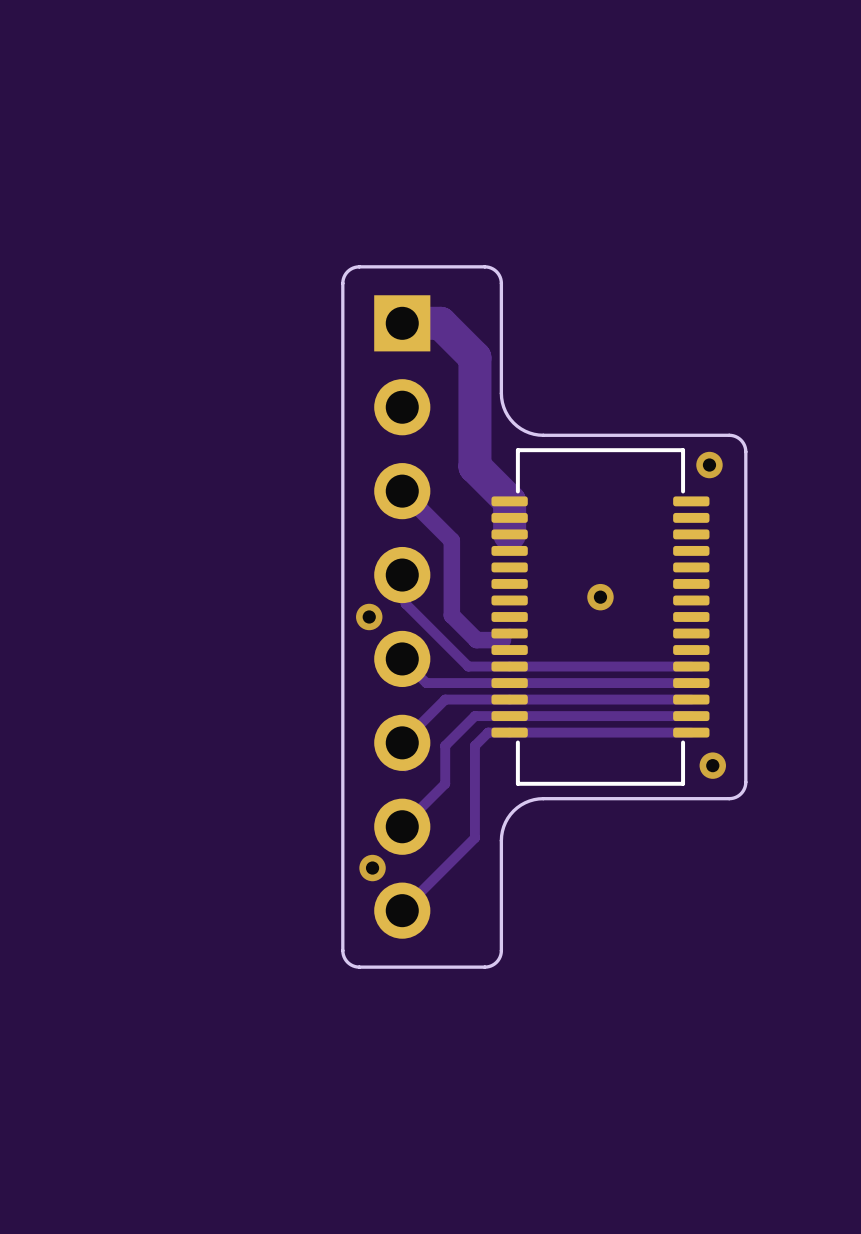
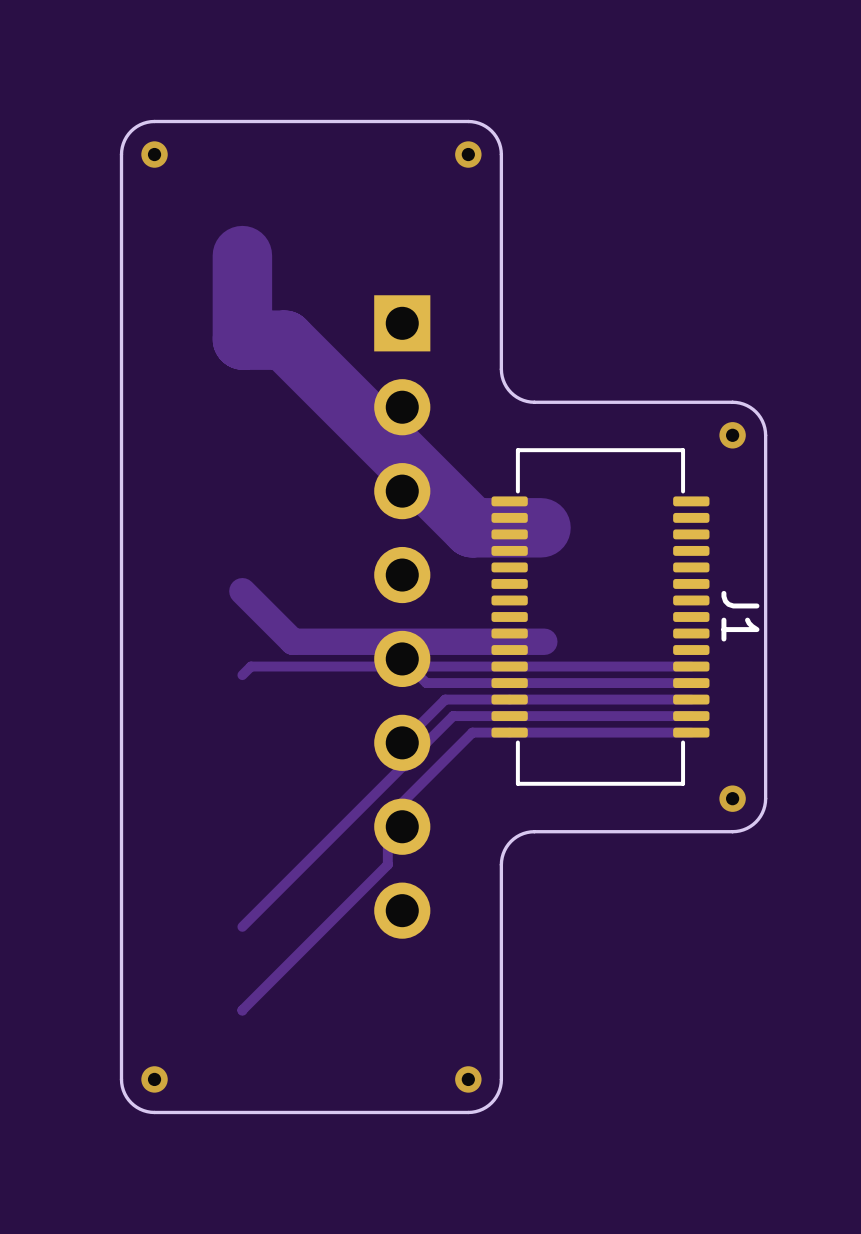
via: none -> (154, 154)
via: none -> (468, 154)
track: none -> (242, 255) (243, 340) (284, 340) (472, 527) (541, 527)
board edge: (501, 283) (496, 271) (484, 266) (357, 266) (347, 271) (342, 283) (343, 954) (349, 963) (357, 966) (484, 967) (496, 962) (501, 950) -> (501, 283) (501, 150) (494, 133) (479, 123) (468, 121) (154, 121) (136, 126) (124, 140) (121, 154) (121, 1079) (123, 1090) (133, 1105) (150, 1112) (468, 1112) (479, 1110) (494, 1100) (501, 1083) (501, 950)
track: (402, 323) (440, 323) (474, 357) (474, 466) (509, 501) (509, 534) -> none
board edge: (501, 369) (501, 398) (505, 411) (517, 426) (529, 432) (543, 435) (731, 435) (742, 441) (745, 451) (745, 782) (743, 790) (737, 796) (729, 798) (543, 798) (529, 801) (517, 807) (505, 822) (501, 835) (501, 864) -> (501, 369) (503, 380) (508, 389) (516, 397) (530, 402) (739, 403) (750, 407) (758, 414) (763, 424) (765, 435) (765, 798) (760, 816) (750, 826) (736, 831) (527, 832) (516, 836) (508, 844) (503, 853) (501, 864)
via position: (709, 465) -> (732, 435)
track: (402, 491) (451, 540) (451, 615) (476, 640) (503, 640) (509, 633) -> none
track: none -> (242, 591) (292, 641) (544, 641)
via: (600, 597) -> none
track: (405, 598) (405, 603) (468, 666) -> (242, 675) (250, 666) (468, 666)
via: (369, 616) -> none
J1 name: none -> J1 (740, 616)
track: (474, 716) (445, 745) (445, 783) (405, 823) -> (474, 716) (453, 716) (242, 926)
track: (488, 732) (474, 745) (474, 837) (402, 910) -> (488, 732) (472, 732) (387, 817) (387, 864) (242, 1010)
via position: (712, 765) -> (732, 798)
via: (372, 868) -> none
via: none -> (154, 1079)
via: none -> (468, 1079)

